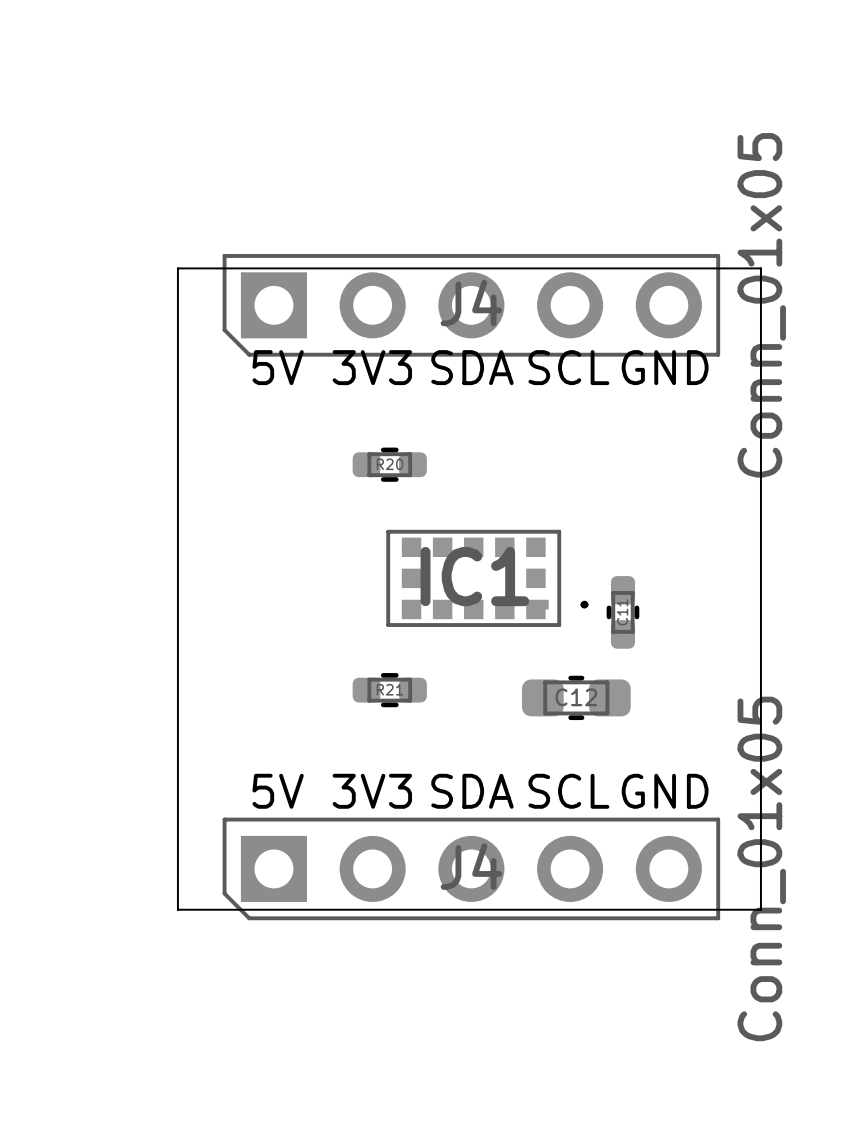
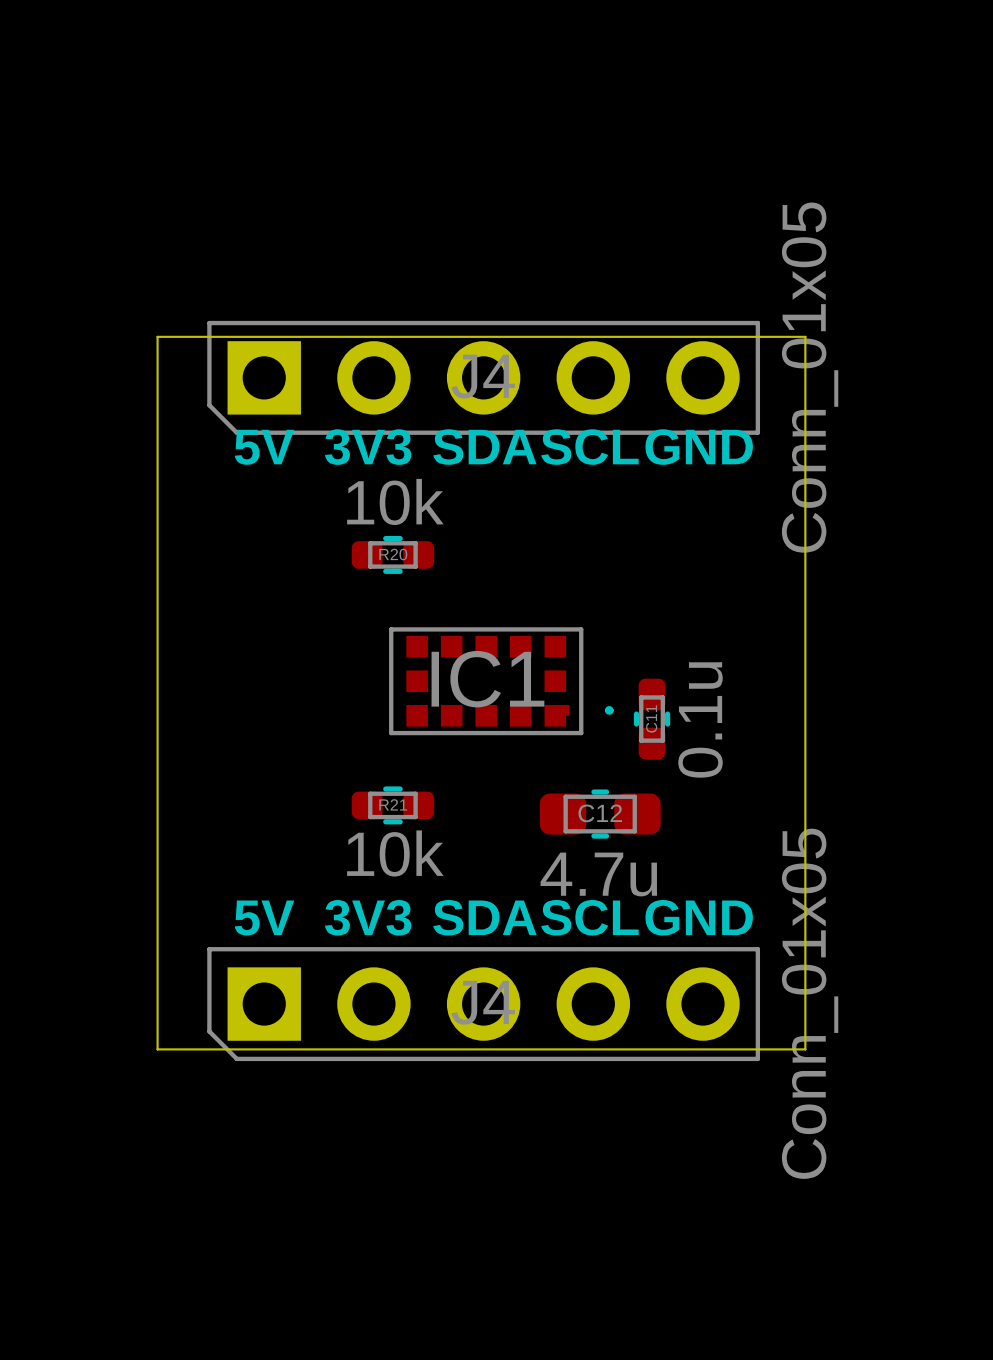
R20 value: none -> 10k (395, 501)
C11 value: none -> 0.1u (700, 719)
R21 value: none -> 10k (395, 853)
C12 value: none -> 4.7u (598, 874)

